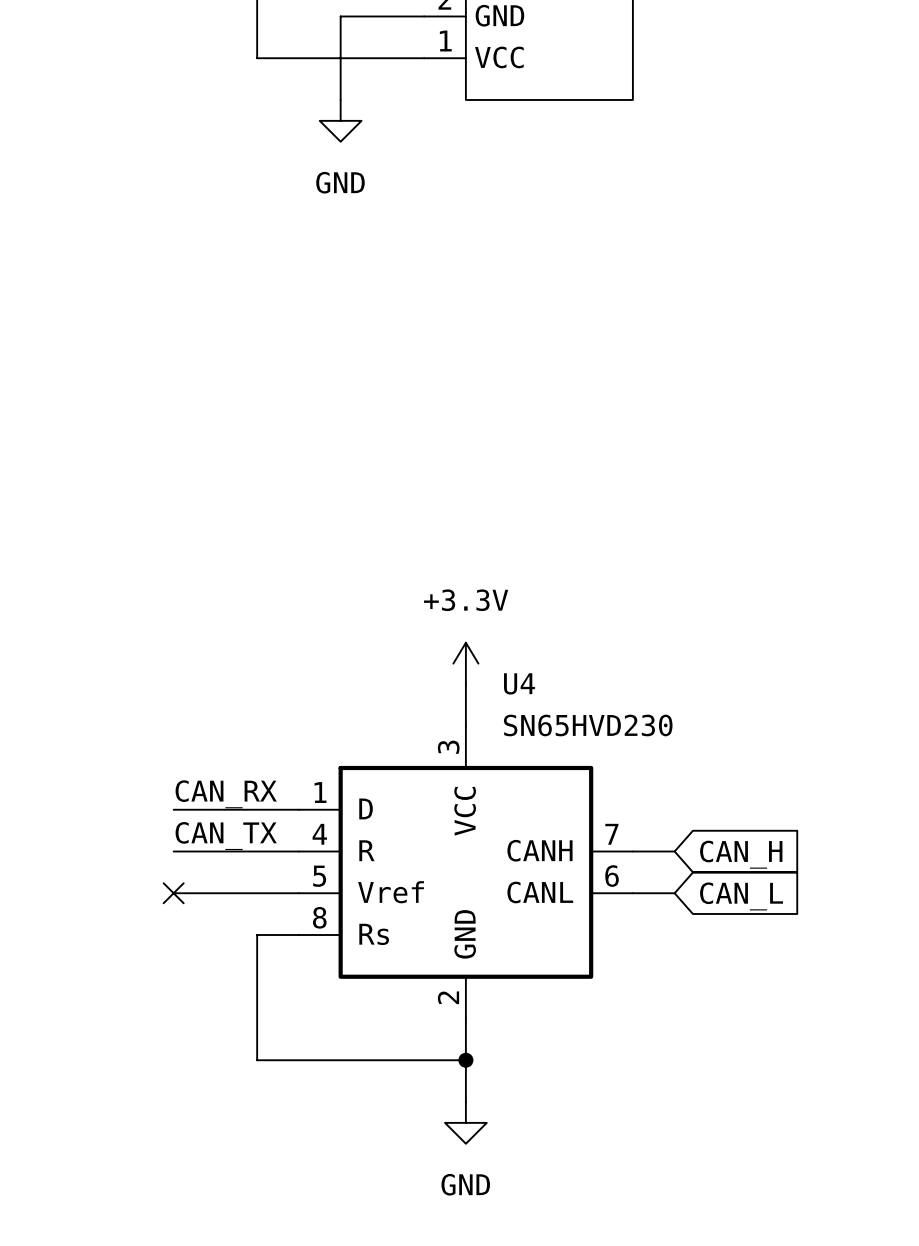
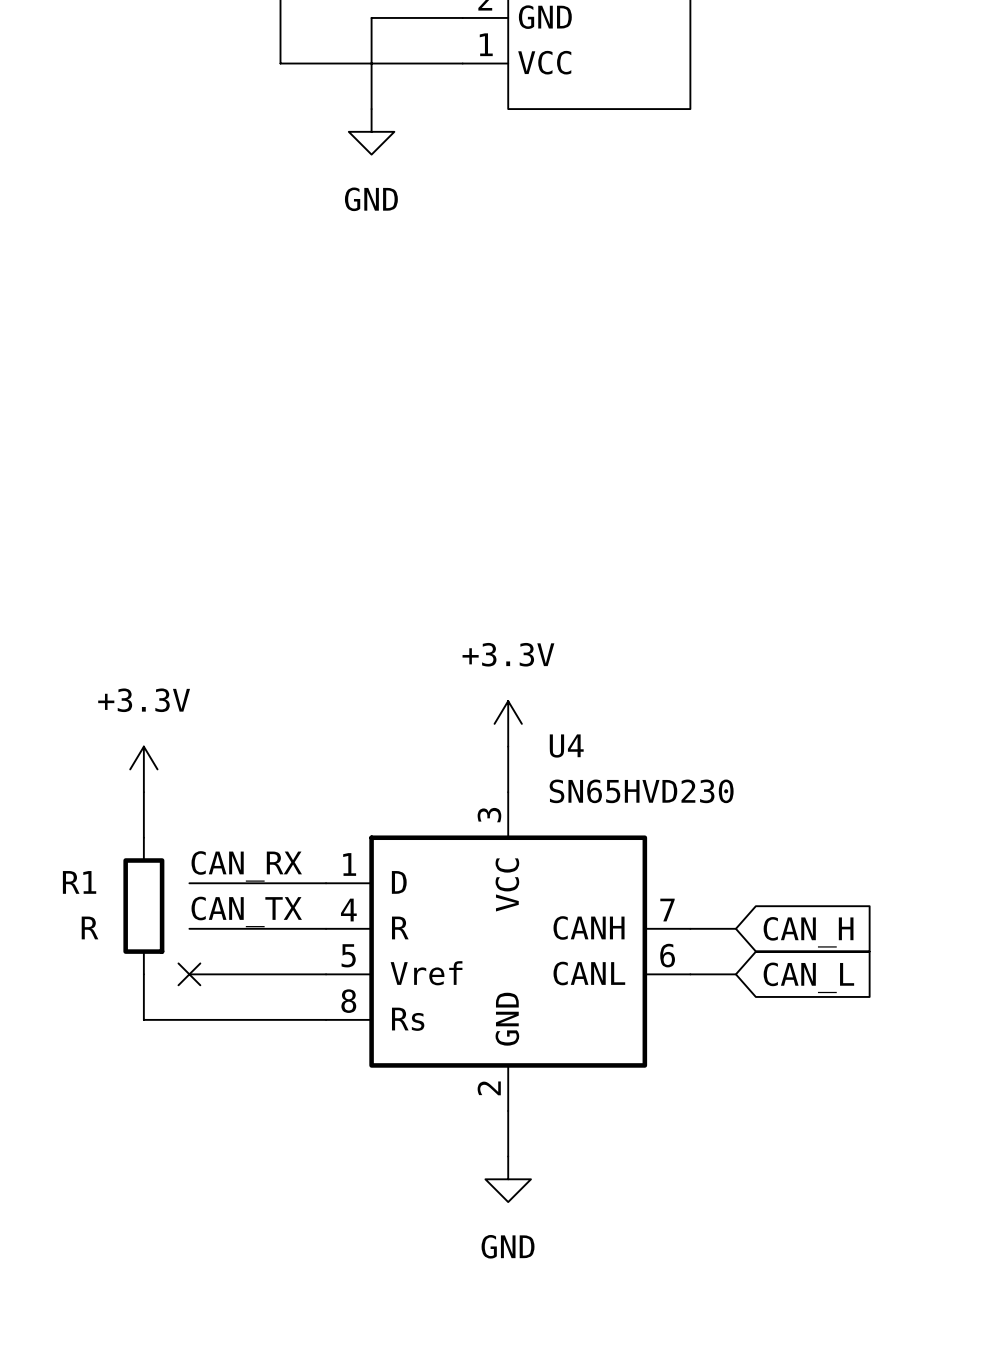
power symbol: none -> +3.3V (143, 769)
wire: none -> (143, 792) (143, 837)
R1: none -> R (143, 906)
wire: (257, 935) (257, 1060) (465, 1060) (465, 1102) -> (280, 1019) (143, 1019) (143, 974)
junction: (465, 1060) -> none
power symbol position: GND (465, 1122) -> GND (508, 1179)

